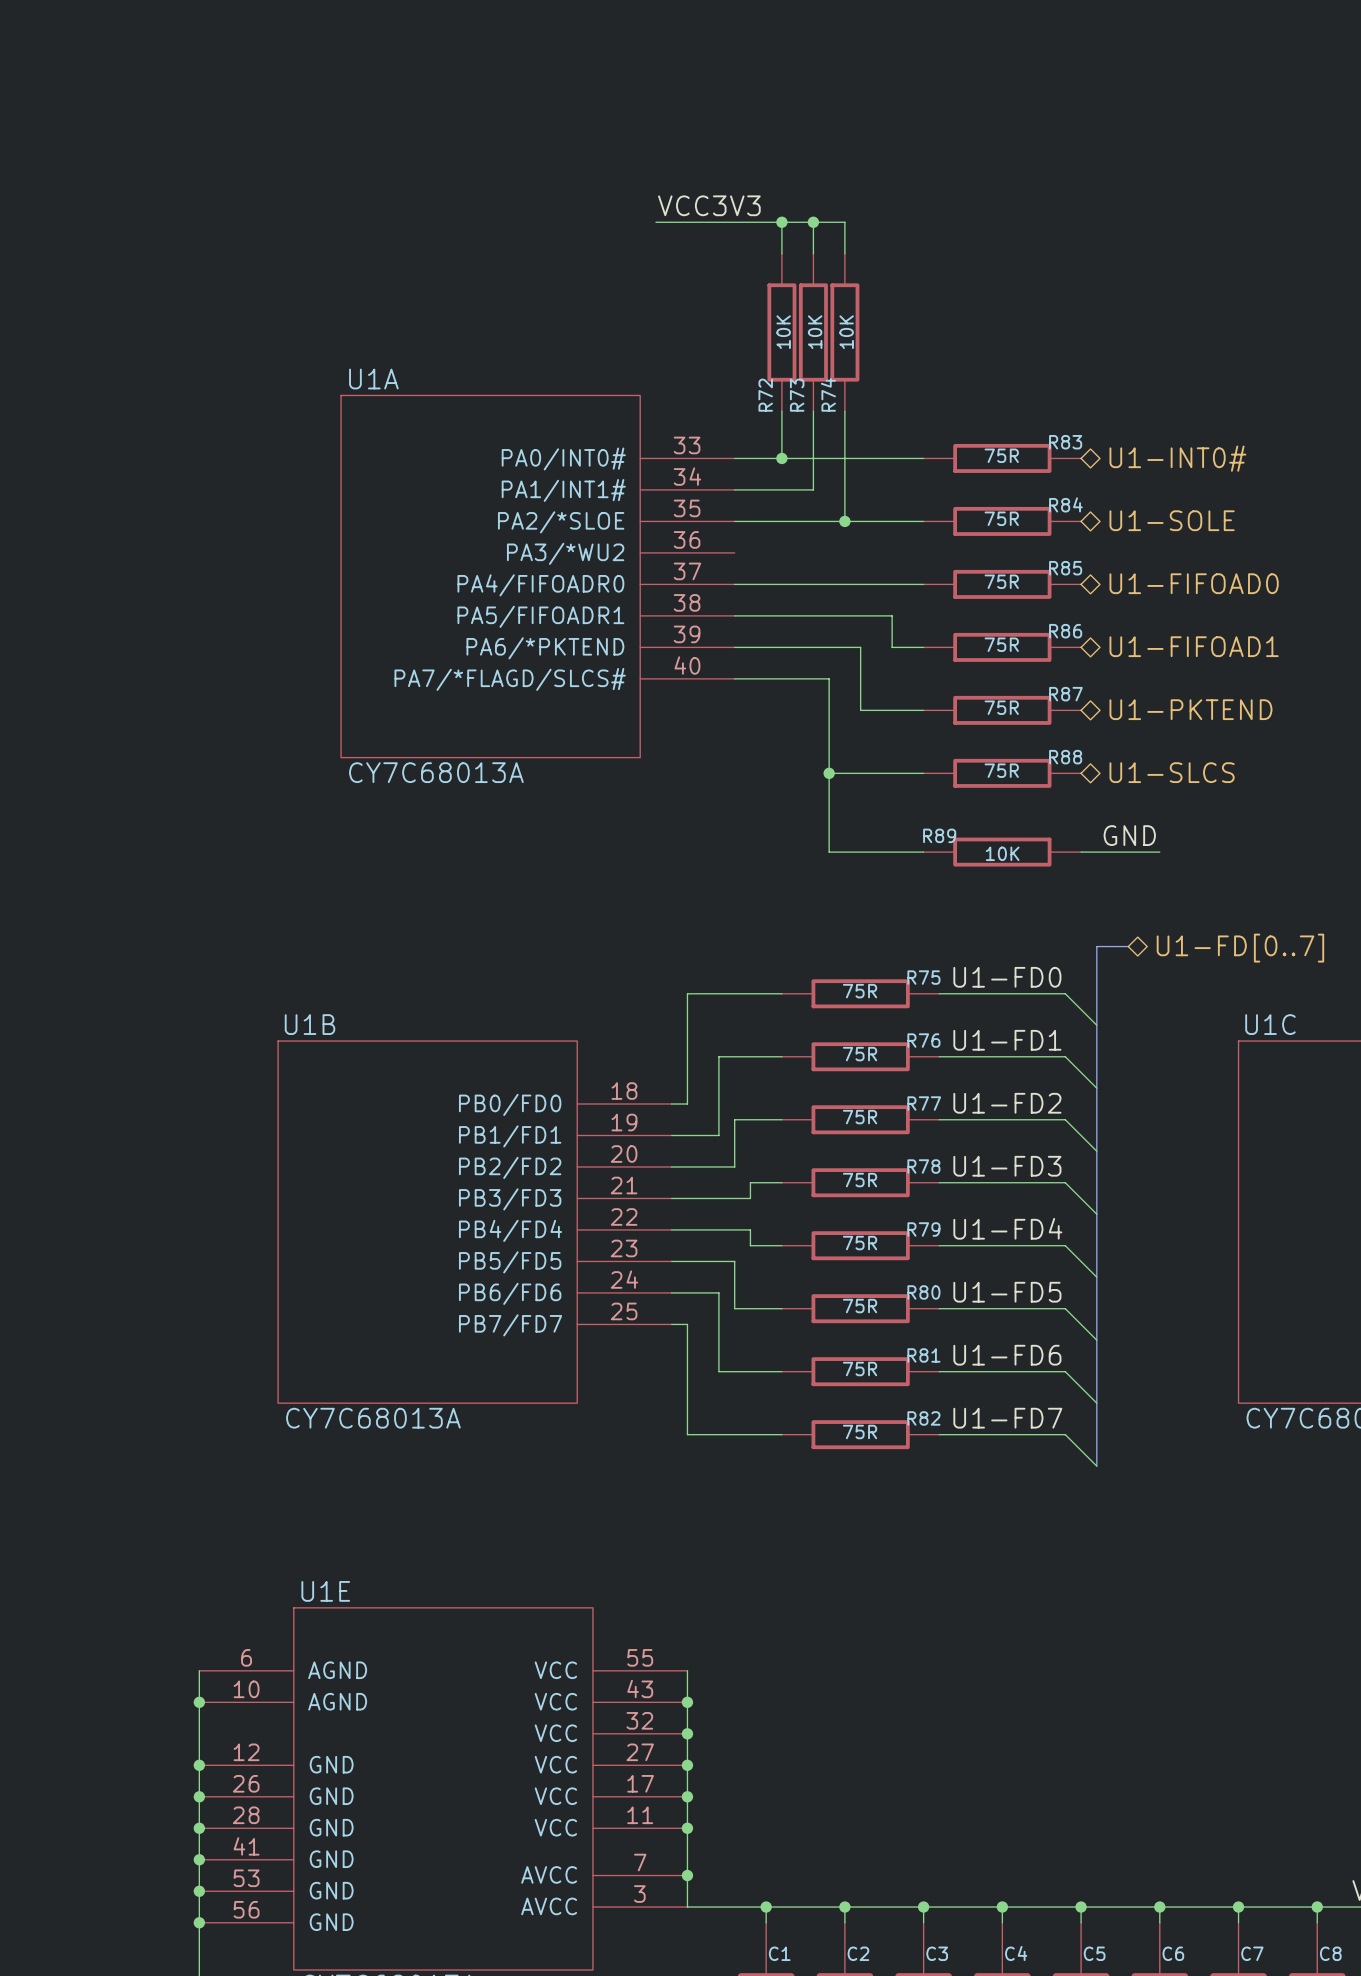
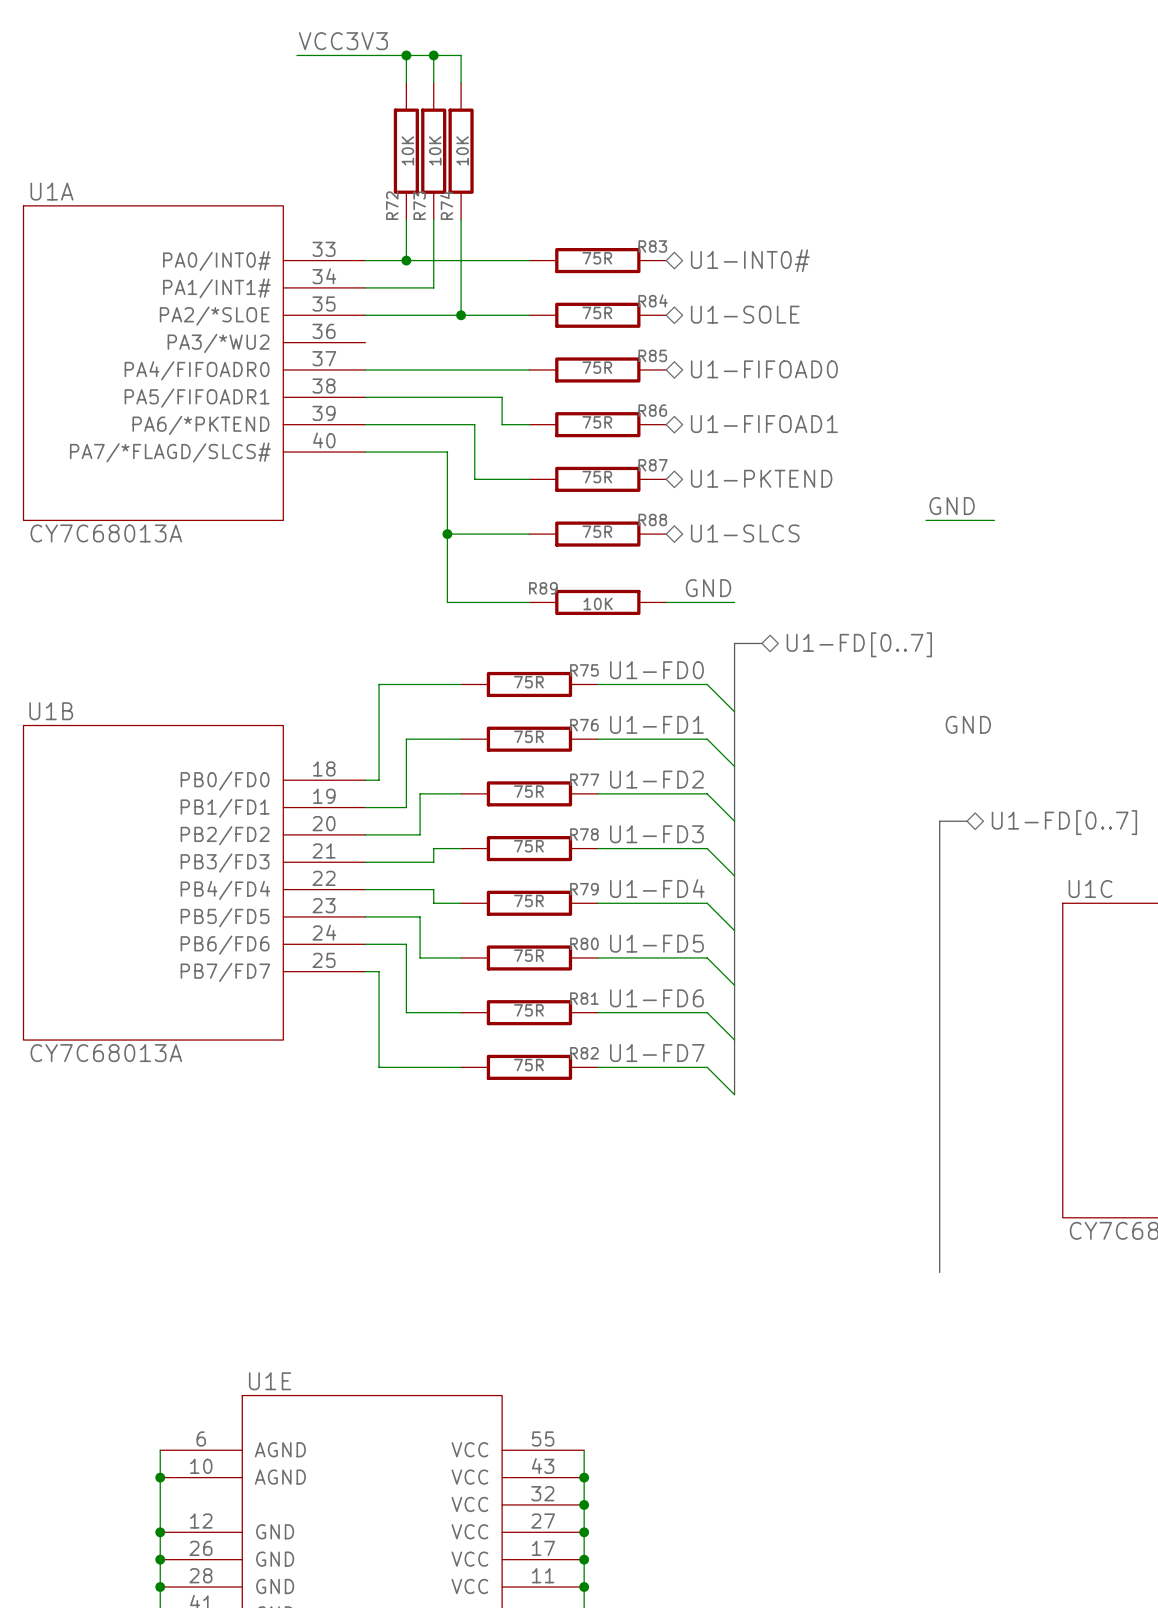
label: none -> VCC3V3 (343, 41)
wire: none -> (296, 55) (461, 55) (461, 82)
wire: none -> (406, 55) (406, 82)
junction: none -> (406, 55)
wire: none -> (433, 55) (433, 82)
junction: none -> (433, 55)
label: VCC3V3 (709, 205) -> none
wire: (655, 222) (844, 222) (844, 253) -> none
wire: (781, 222) (781, 253) -> none
junction: (781, 222) -> none
wire: (813, 222) (813, 253) -> none
junction: (813, 222) -> none
wire: none -> (406, 219) (406, 260)
wire: none -> (433, 219) (433, 287) (365, 287)
wire: none -> (461, 219) (461, 315)
wire: none -> (365, 260) (529, 260)
junction: none -> (406, 260)
hierarchical label: none -> U1-INT0# (750, 260)
R72 position: (781, 332) -> (406, 151)
R73 position: (813, 332) -> (433, 151)
R74 position: (844, 332) -> (461, 151)
wire: none -> (365, 315) (529, 315)
junction: none -> (461, 315)
hierarchical label: none -> U1-SOLE (745, 314)
wire: (781, 411) (781, 458) -> none
wire: (813, 411) (813, 489) (734, 489) -> none
wire: (844, 411) (844, 521) -> none
hierarchical label: none -> U1-FIFOAD0 (764, 369)
wire: none -> (365, 397) (502, 397) (502, 424) (529, 424)
wire: (734, 458) (923, 458) -> (365, 369) (529, 369)
junction: (781, 458) -> none
R83 position: (1002, 458) -> (597, 260)
hierarchical label: U1-INT0# (1177, 458) -> none
wire: none -> (365, 424) (474, 424) (474, 479) (529, 479)
hierarchical label: none -> U1-FIFOAD1 (764, 424)
hierarchical label: U1-SOLE (1172, 520) -> none
wire: none -> (365, 452) (447, 452) (447, 602) (529, 602)
wire: (734, 521) (923, 521) -> none
junction: (844, 521) -> none
R84 position: (1002, 521) -> (597, 315)
hierarchical label: none -> U1-PKTEND (761, 478)
U1A position: (537, 576) -> (194, 363)
label: none -> GND (952, 506)
hierarchical label: U1-FIFOAD0 (1194, 583) -> none
wire: (734, 584) (923, 584) -> none
R85 position: (1002, 584) -> (597, 369)
wire: none -> (447, 534) (529, 534)
junction: none -> (447, 534)
wire: (734, 615) (892, 615) (892, 647) (923, 647) -> none
hierarchical label: none -> U1-SLCS (745, 533)
hierarchical label: U1-FIFOAD1 (1194, 646) -> none
wire: (734, 647) (860, 647) (860, 710) (923, 710) -> none
R86 position: (1002, 647) -> (597, 424)
wire: (734, 678) (829, 678) (829, 852) (923, 852) -> none
label: none -> GND (708, 588)
wire: none -> (666, 602) (734, 602)
hierarchical label: U1-PKTEND (1190, 709) -> none
R87 position: (1002, 710) -> (597, 479)
bus: none -> (761, 643) (734, 643) (734, 1094)
hierarchical label: none -> U1-FD[0..7] (859, 644)
label: none -> U1-FD0 (656, 670)
hierarchical label: U1-SLCS (1172, 772) -> none
wire: (829, 773) (923, 773) -> none
junction: (829, 773) -> none
R88 position: (1002, 773) -> (597, 534)
wire: none -> (461, 684) (379, 684) (379, 780) (365, 780)
wire: none -> (597, 684) (707, 684) (734, 711)
label: none -> U1-FD1 (656, 724)
wire: none -> (461, 739) (406, 739) (406, 807) (365, 807)
R89 position: (1002, 852) -> (597, 602)
wire: (1081, 852) (1159, 852) -> (926, 520) (994, 520)
label: none -> U1-FD2 (656, 779)
wire: none -> (461, 793) (420, 793) (420, 834) (365, 834)
label: none -> U1-FD3 (656, 834)
label: U1-FD0 (1007, 977) -> none
wire: none -> (461, 848) (433, 848) (433, 862) (365, 862)
wire: (781, 993) (687, 993) (687, 1104) (671, 1104) -> none
R75 position: (860, 993) -> (529, 684)
wire: (939, 993) (1065, 993) (1096, 1025) -> (597, 739) (707, 739) (734, 766)
label: none -> U1-FD4 (657, 888)
wire: none -> (365, 889) (433, 889) (433, 903) (461, 903)
label: U1-FD1 (1007, 1040) -> none
wire: none -> (365, 916) (420, 916) (420, 957) (461, 957)
wire: (781, 1056) (718, 1056) (718, 1135) (671, 1135) -> none
R76 position: (860, 1056) -> (529, 739)
wire: (939, 1056) (1065, 1056) (1096, 1088) -> (597, 793) (707, 793) (734, 821)
label: none -> U1-FD5 (656, 943)
wire: none -> (365, 944) (406, 944) (406, 1012) (461, 1012)
label: U1-FD2 (1007, 1103) -> none
wire: none -> (365, 971) (379, 971) (379, 1067) (461, 1067)
wire: (781, 1119) (734, 1119) (734, 1166) -> (734, 1040) (707, 1012) (625, 1012)
R77 position: (860, 1119) -> (529, 793)
wire: (939, 1119) (1065, 1119) (1096, 1151) -> (597, 848) (707, 848) (734, 875)
label: none -> U1-FD6 (656, 998)
label: U1-FD3 (1007, 1166) -> none
wire: (781, 1182) (750, 1182) (750, 1198) (671, 1198) -> none
R78 position: (860, 1182) -> (529, 848)
wire: (939, 1182) (1065, 1182) (1096, 1214) -> (597, 903) (707, 903) (734, 930)
label: none -> U1-FD7 (657, 1053)
U1B position: (474, 1222) -> (194, 882)
label: U1-FD4 (1007, 1228) -> none
wire: (750, 1229) (750, 1245) (781, 1245) -> (638, 1067) (707, 1067) (734, 1094)
R79 position: (860, 1245) -> (529, 903)
wire: (939, 1245) (1065, 1245) (1096, 1277) -> (597, 957) (707, 957) (734, 985)
wire: (671, 1261) (734, 1261) (734, 1308) (781, 1308) -> none
wire: (671, 1292) (718, 1292) (718, 1371) (781, 1371) -> none
label: U1-FD5 (1007, 1292) -> none
R80 position: (860, 1308) -> (529, 957)
wire: (939, 1308) (1065, 1308) (1096, 1340) -> none
wire: (671, 1324) (687, 1324) (687, 1434) (781, 1434) -> none
label: U1-FD6 (1007, 1355) -> none
R81 position: (860, 1371) -> (529, 1012)
wire: (939, 1371) (1065, 1371) (1096, 1403) -> none
label: U1-FD7 (1007, 1418) -> none
R82 position: (860, 1434) -> (529, 1067)
wire: (939, 1434) (1065, 1434) (1096, 1466) -> none

